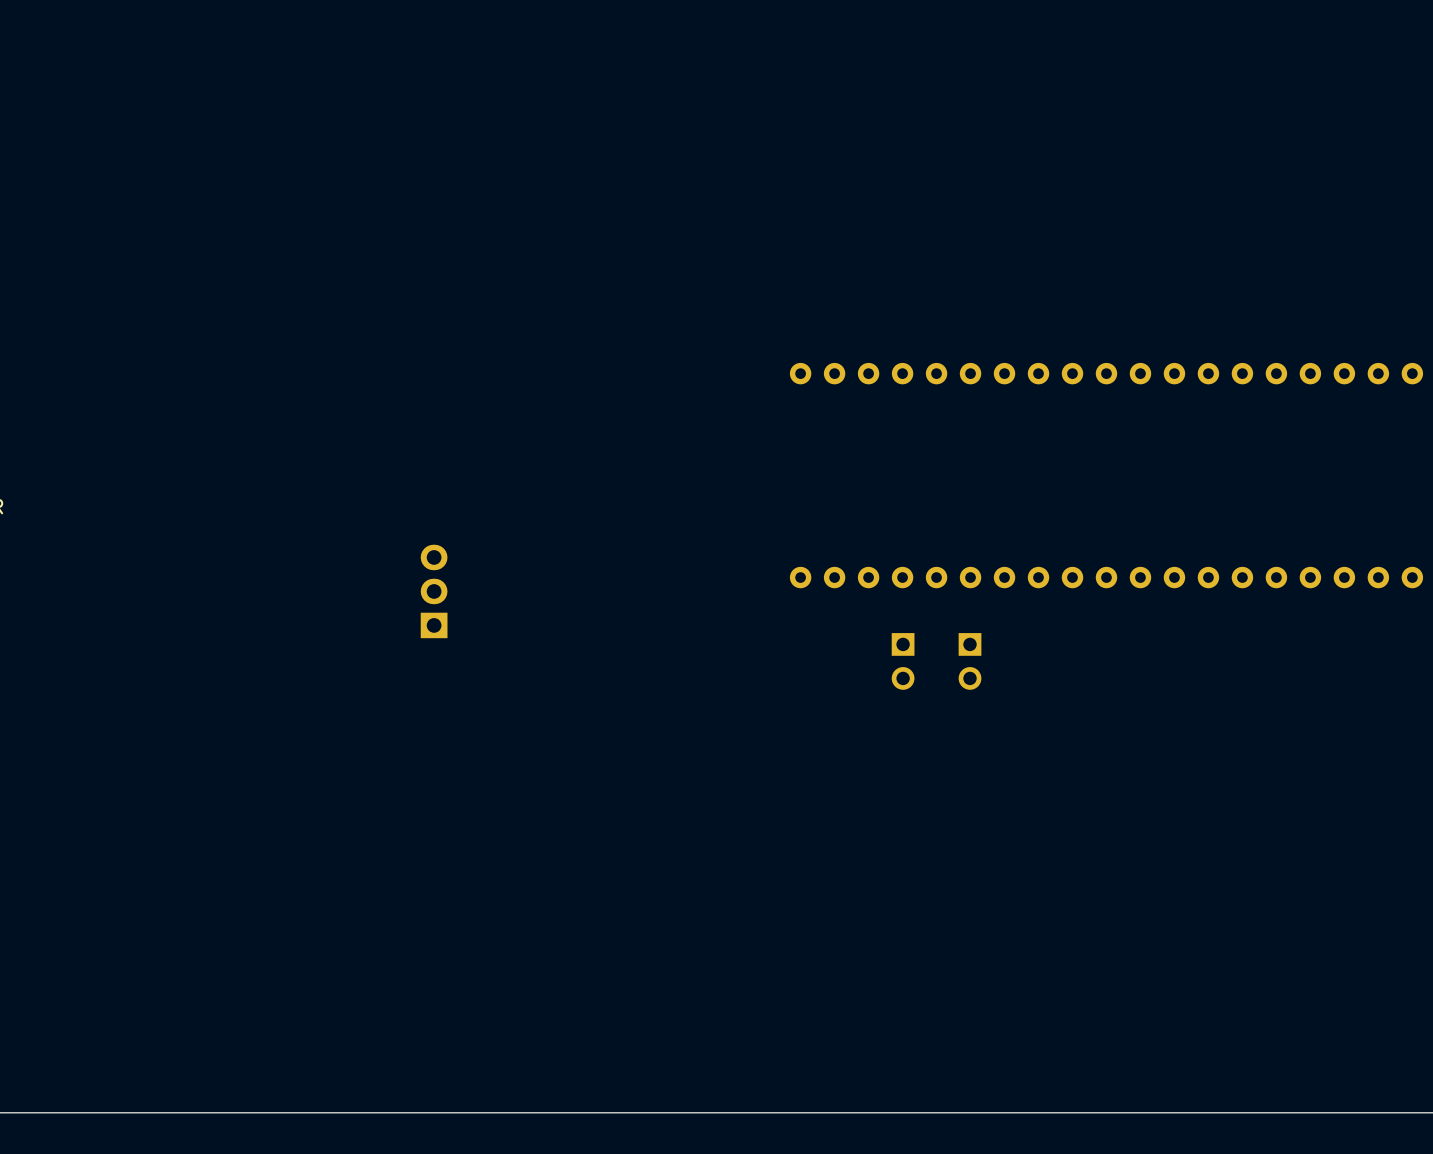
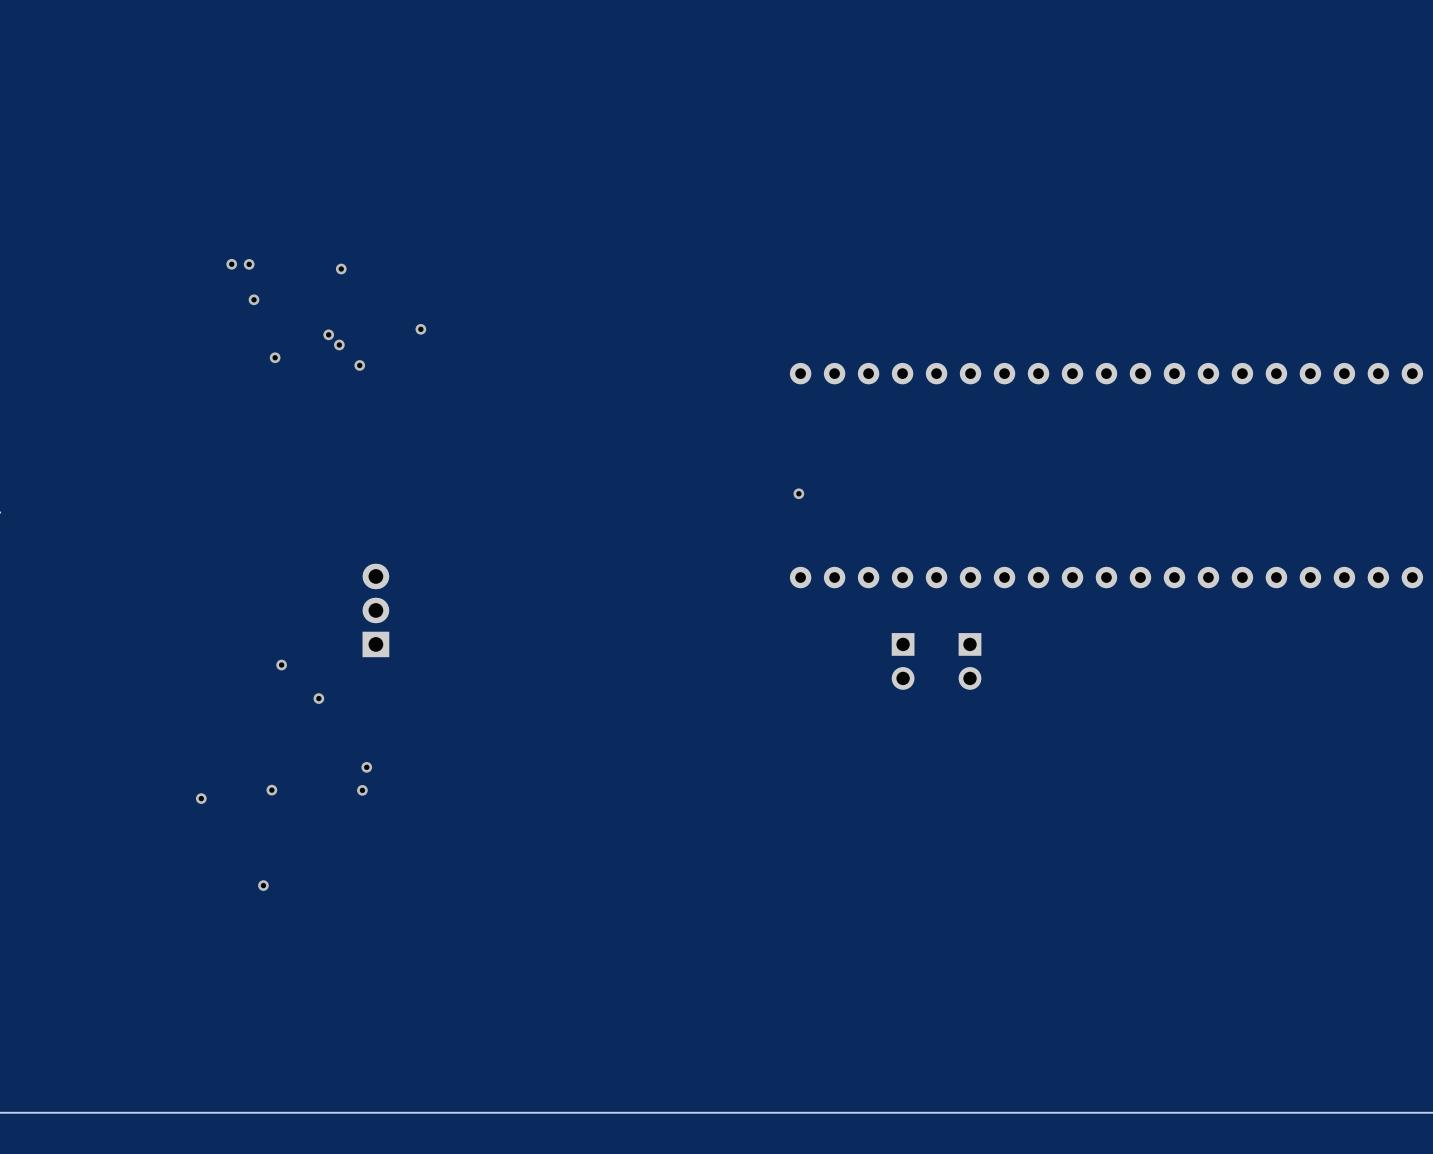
via: none -> (231, 264)
via: none -> (249, 264)
via: none -> (341, 269)
via: none -> (254, 299)
via: none -> (420, 329)
via: none -> (328, 334)
via: none -> (339, 344)
via: none -> (275, 357)
via: none -> (359, 365)
via: none -> (798, 493)
part position: (434, 591) -> (375, 610)
via: none -> (281, 665)
via: none -> (318, 698)
via: none -> (366, 767)
via: none -> (271, 790)
via: none -> (362, 790)
via: none -> (201, 798)
via: none -> (263, 885)

